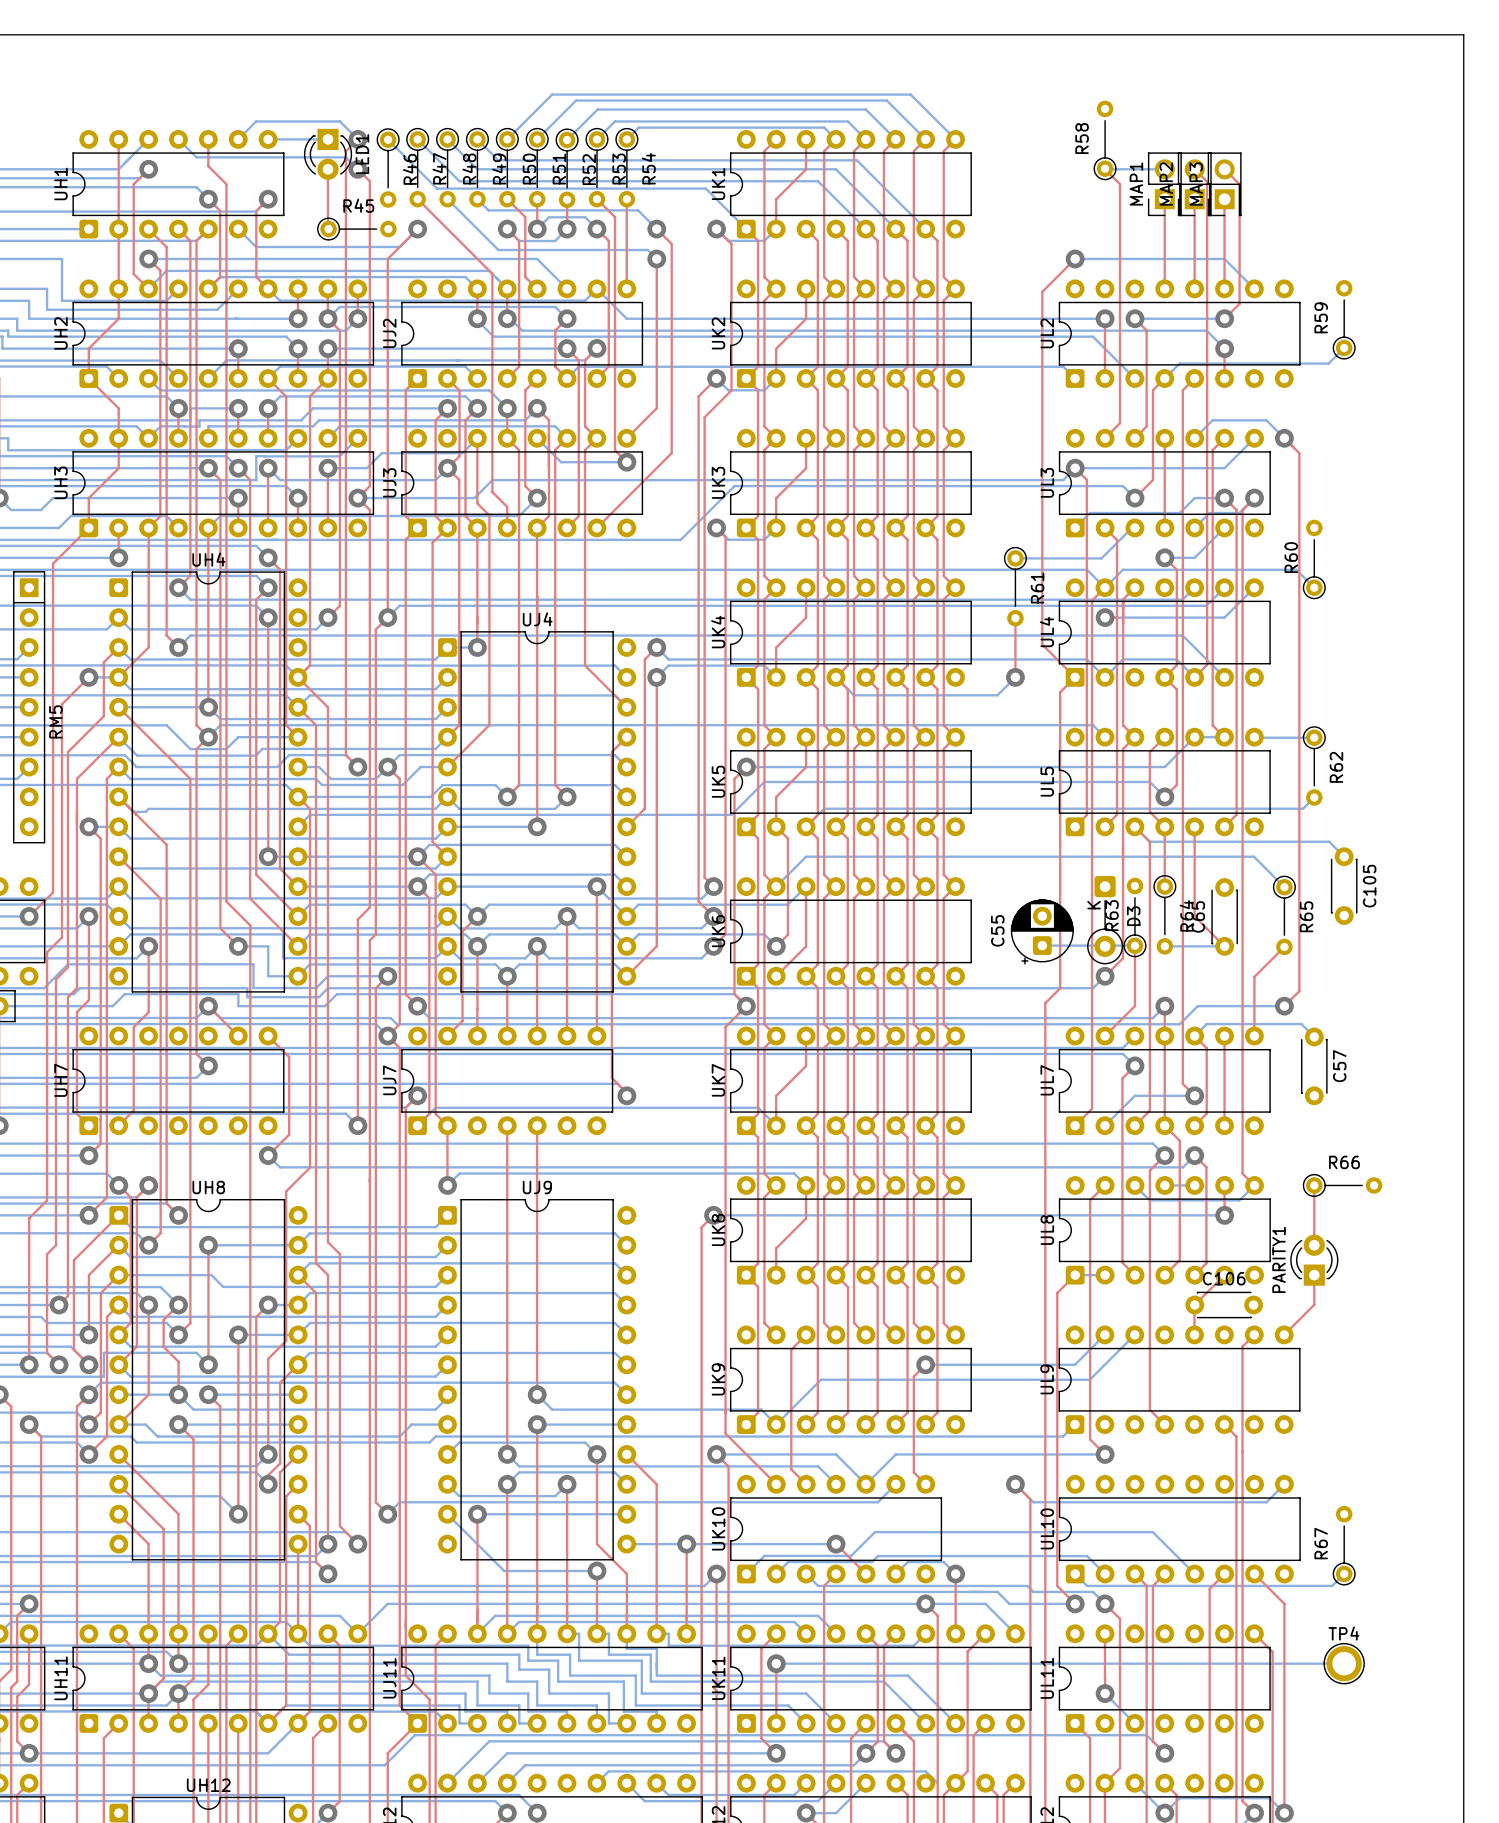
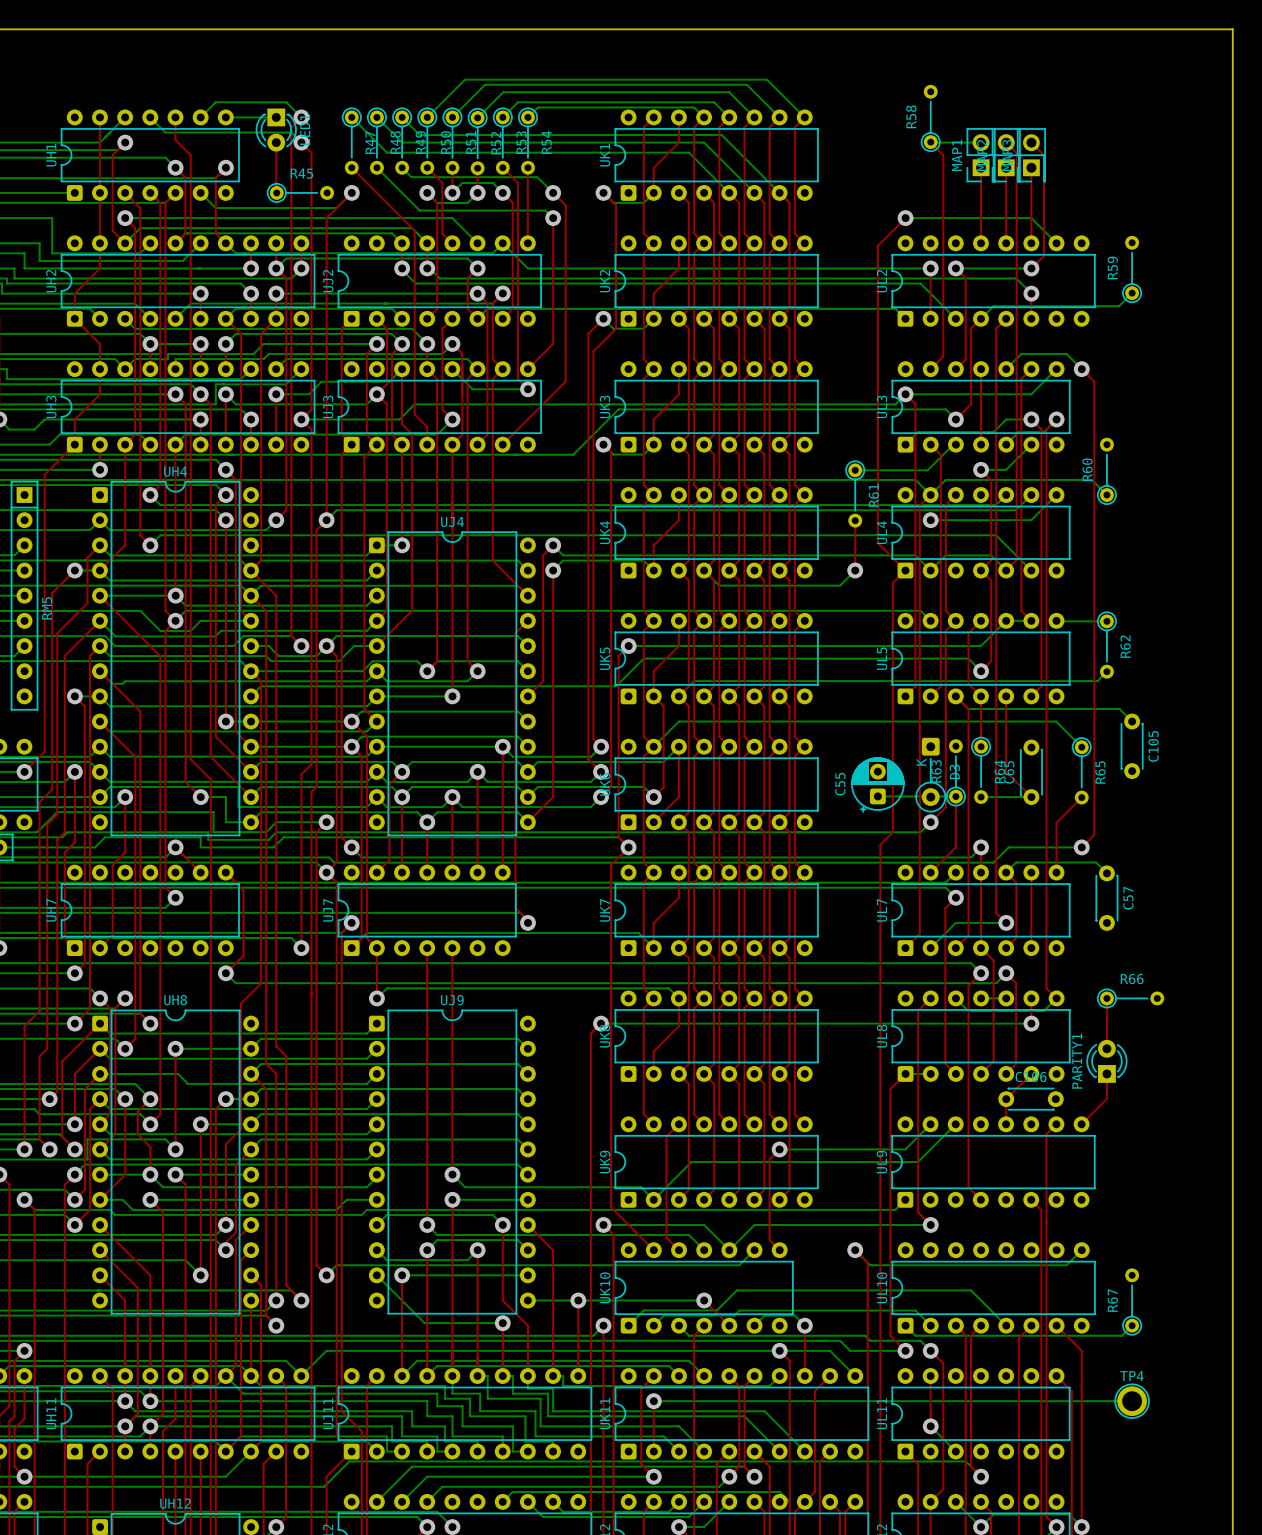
bottom track: (388, 139) (436, 188) (705, 188) (746, 229) -> none
R46: (388, 167) -> none
top track: (746, 229) (758, 240) (758, 366) (746, 378) (758, 390) (758, 516) (746, 527) (758, 539) (758, 665) (746, 677) (758, 689) (758, 814) (746, 826) (758, 838) (758, 964) (746, 976) (758, 988) (758, 1113) (746, 1125) (758, 1137) (758, 1263) (746, 1275) -> none
top track: (748, 1277) (758, 1286) (758, 1412) (746, 1424) -> none

